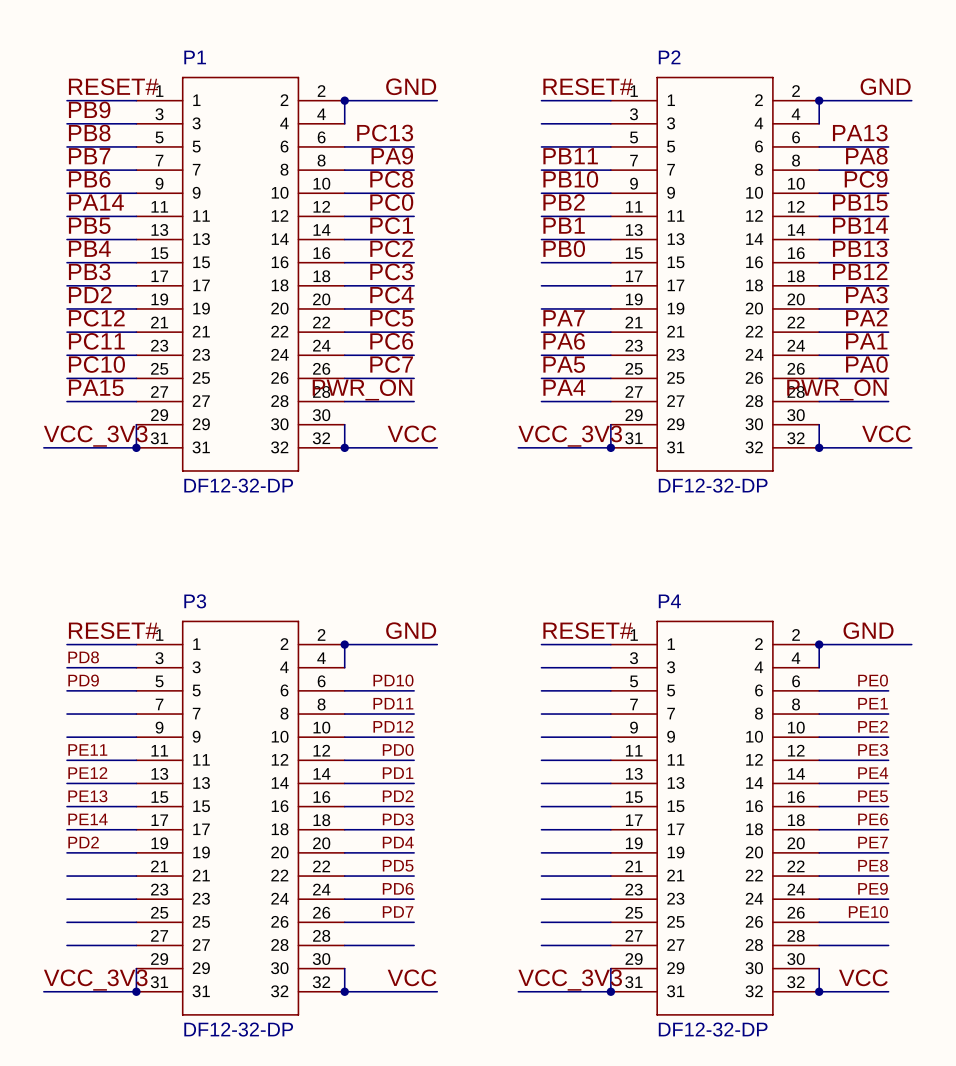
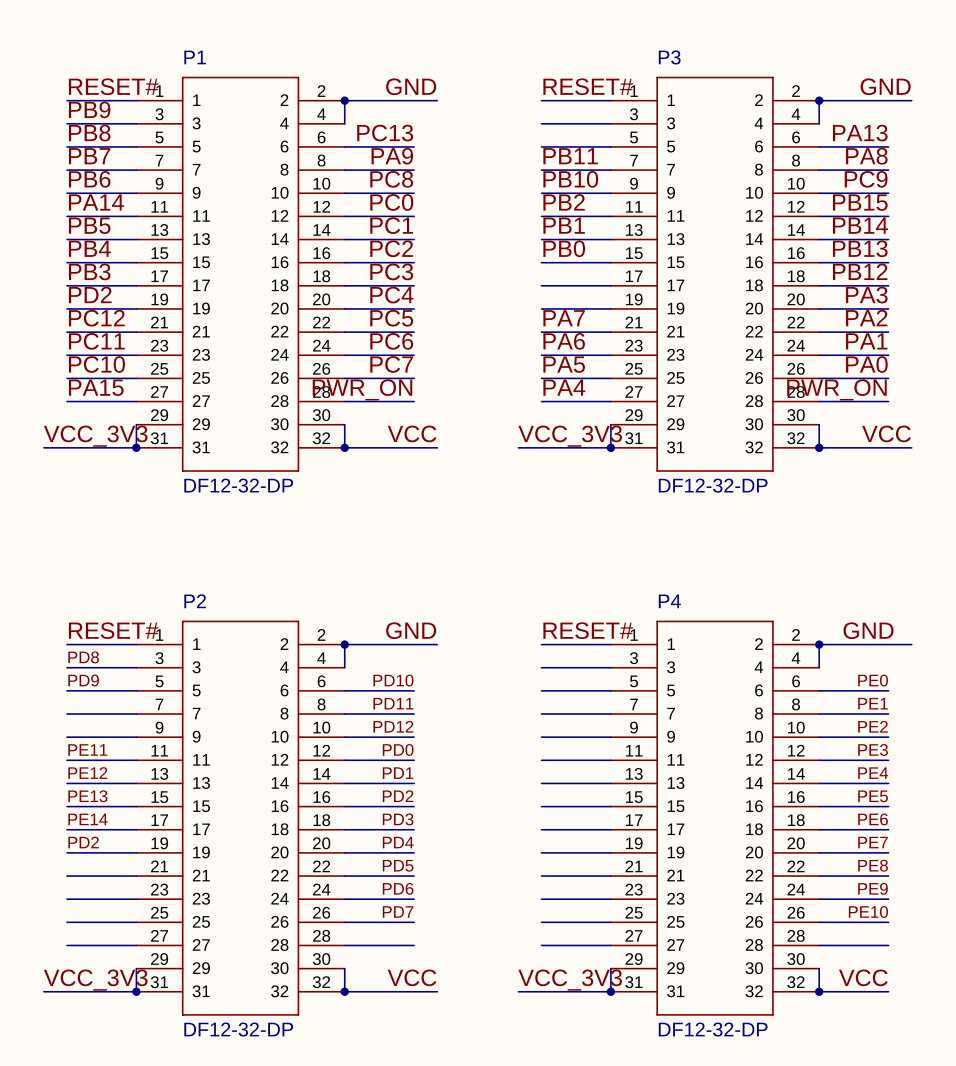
P2 name: P2 (669, 57) -> P3 (669, 57)
P3 name: P3 (195, 601) -> P2 (195, 601)

